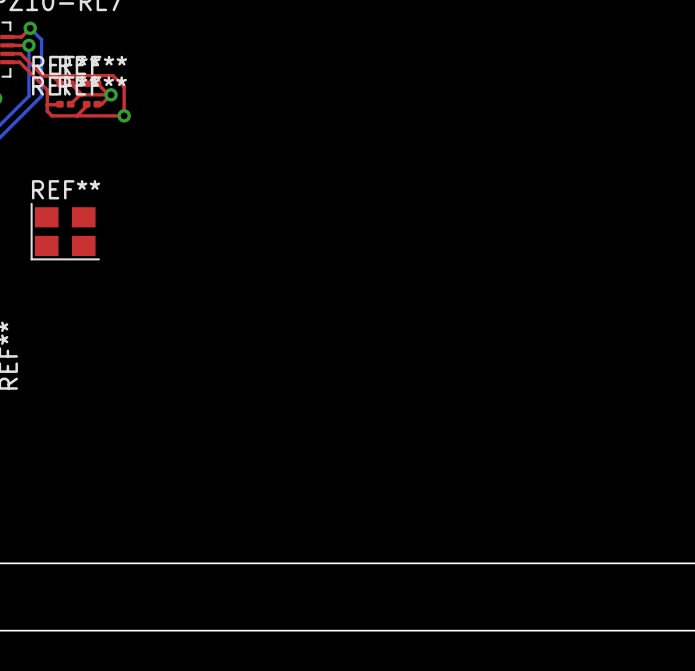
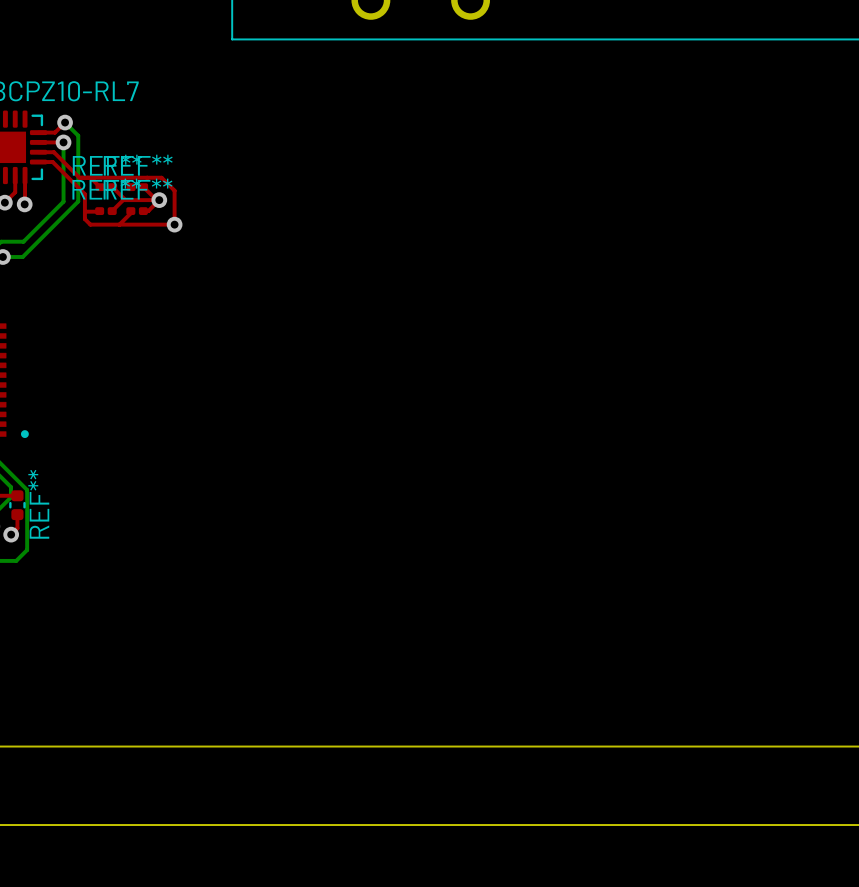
REF**: (65, 231) -> none

